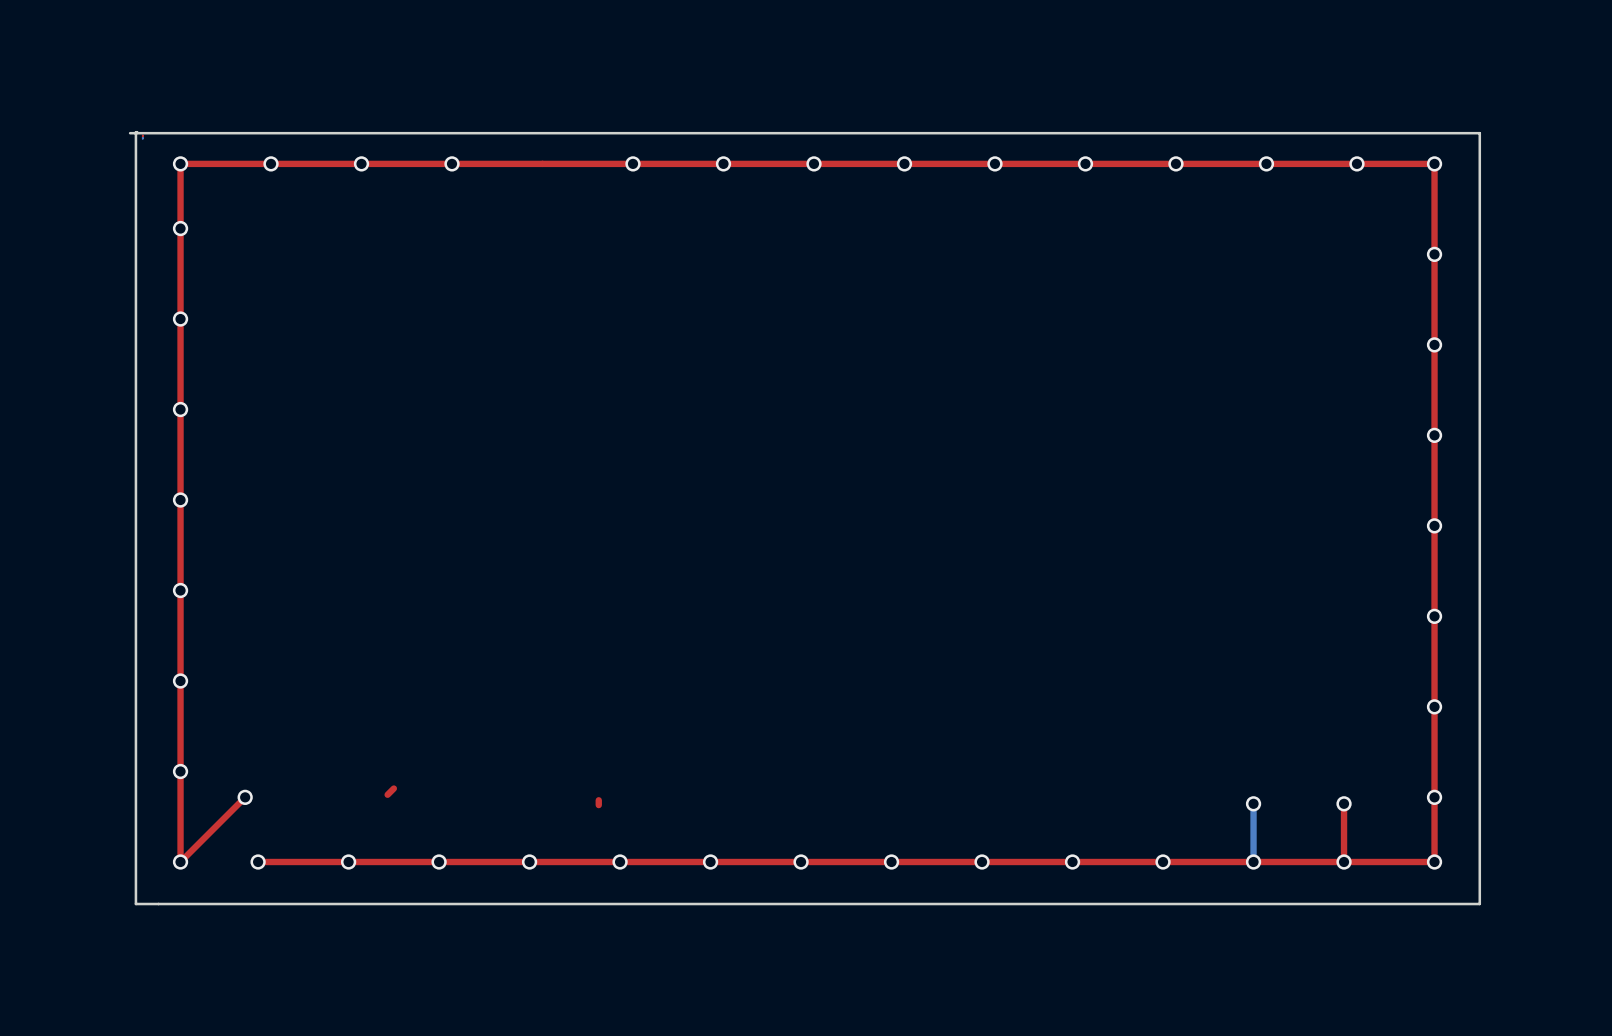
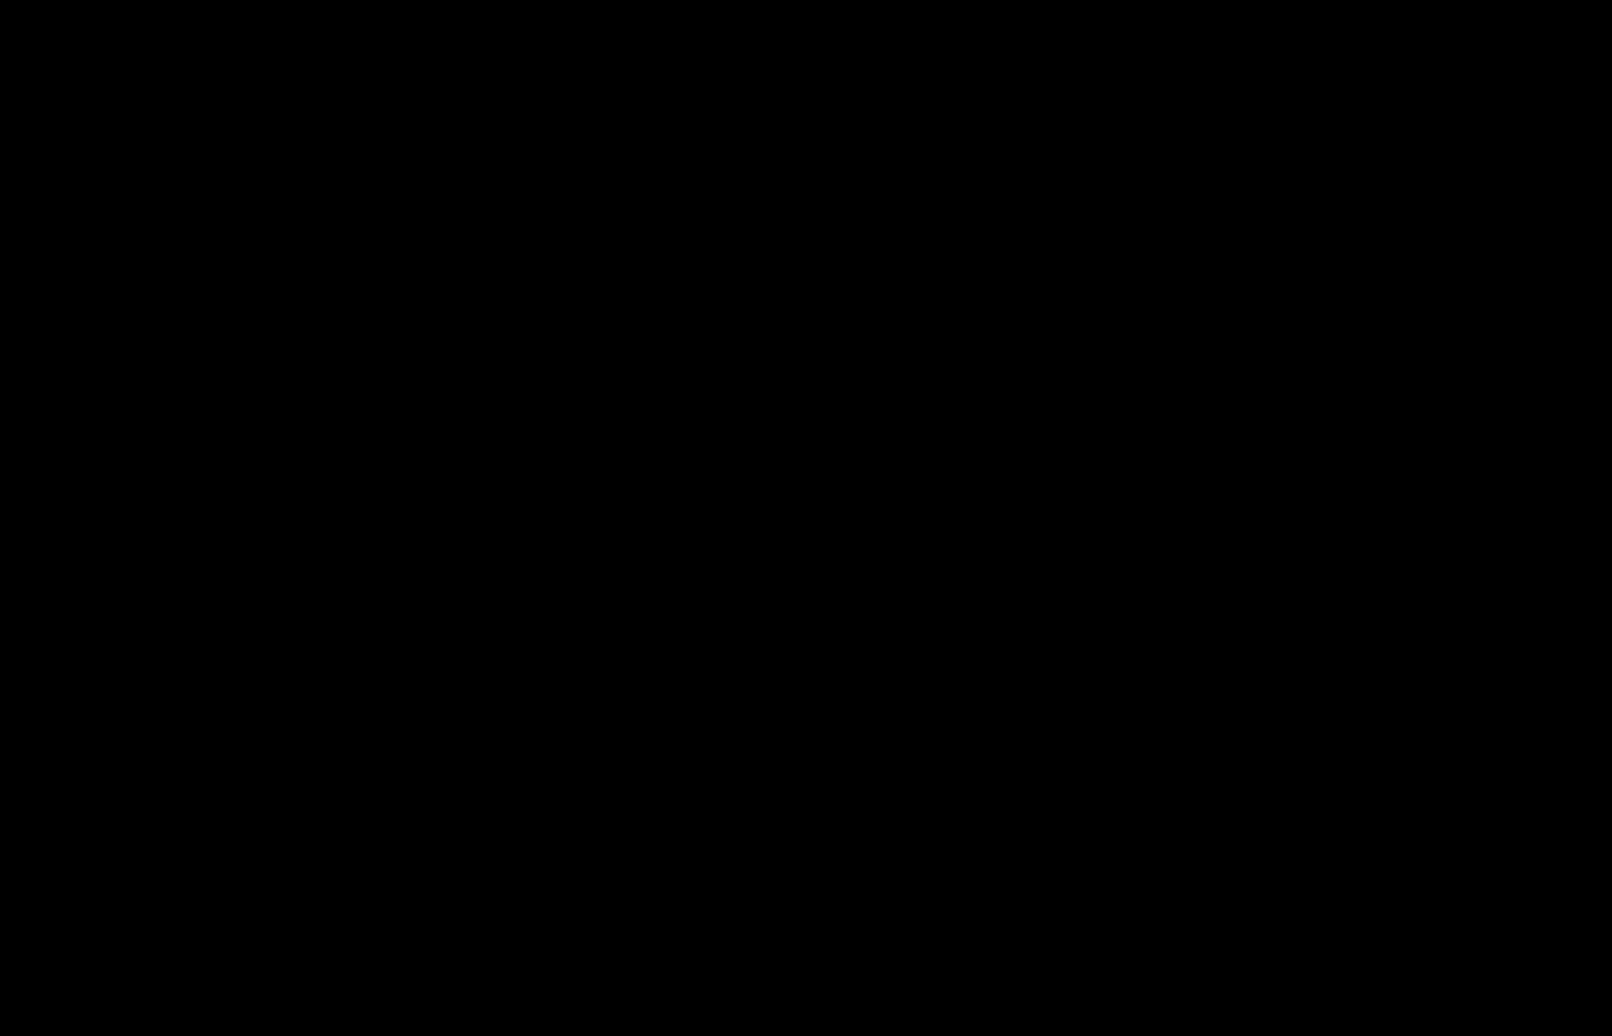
board edge: (137, 132) (135, 132) (135, 904) (1479, 904) (1479, 133) (130, 133) -> none
top zone outline: (142, 134) (142, 137) (142, 134) -> none
bottom zone outline: (142, 137) (142, 139) (142, 137) -> none
via: (180, 163) -> none
via: (271, 163) -> none
via: (361, 163) -> none
via: (452, 163) -> none
via: (633, 163) -> none
via: (723, 163) -> none
via: (813, 163) -> none
via: (904, 163) -> none
via: (994, 163) -> none
via: (1085, 163) -> none
via: (1175, 163) -> none
via: (1266, 163) -> none
via: (1356, 163) -> none
via: (1434, 163) -> none
via: (180, 228) -> none
via: (1434, 254) -> none
via: (180, 319) -> none
via: (1434, 344) -> none
via: (180, 409) -> none
via: (1434, 435) -> none
via: (180, 500) -> none
via: (1434, 525) -> none
via: (180, 590) -> none
via: (1434, 616) -> none
via: (180, 681) -> none
via: (1434, 706) -> none
via: (180, 771) -> none
top track: (393, 788) (387, 794) -> none
top track: (245, 797) (180, 861) (180, 163) (1434, 163) (1434, 861) (258, 861) -> none
via: (245, 797) -> none
via: (1434, 797) -> none
top track: (598, 800) (598, 805) -> none
bottom track: (1253, 803) (1253, 861) -> none
via: (1253, 803) -> none
top track: (1344, 803) (1344, 861) -> none
via: (1344, 803) -> none
via: (180, 861) -> none
via: (258, 861) -> none
via: (348, 861) -> none
via: (439, 861) -> none
via: (529, 861) -> none
via: (620, 861) -> none
via: (710, 861) -> none
via: (801, 861) -> none
via: (891, 861) -> none
via: (982, 861) -> none
via: (1072, 861) -> none
via: (1163, 861) -> none
via: (1253, 861) -> none
via: (1344, 861) -> none
via: (1434, 861) -> none

